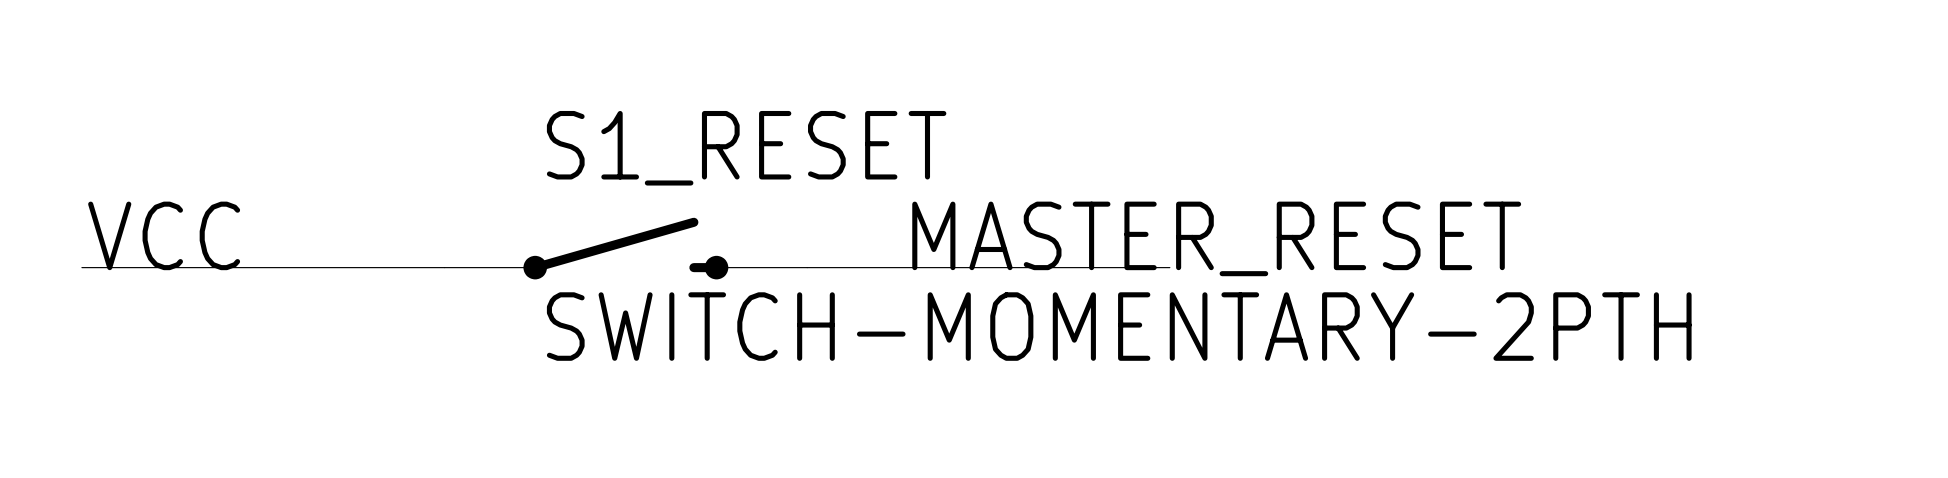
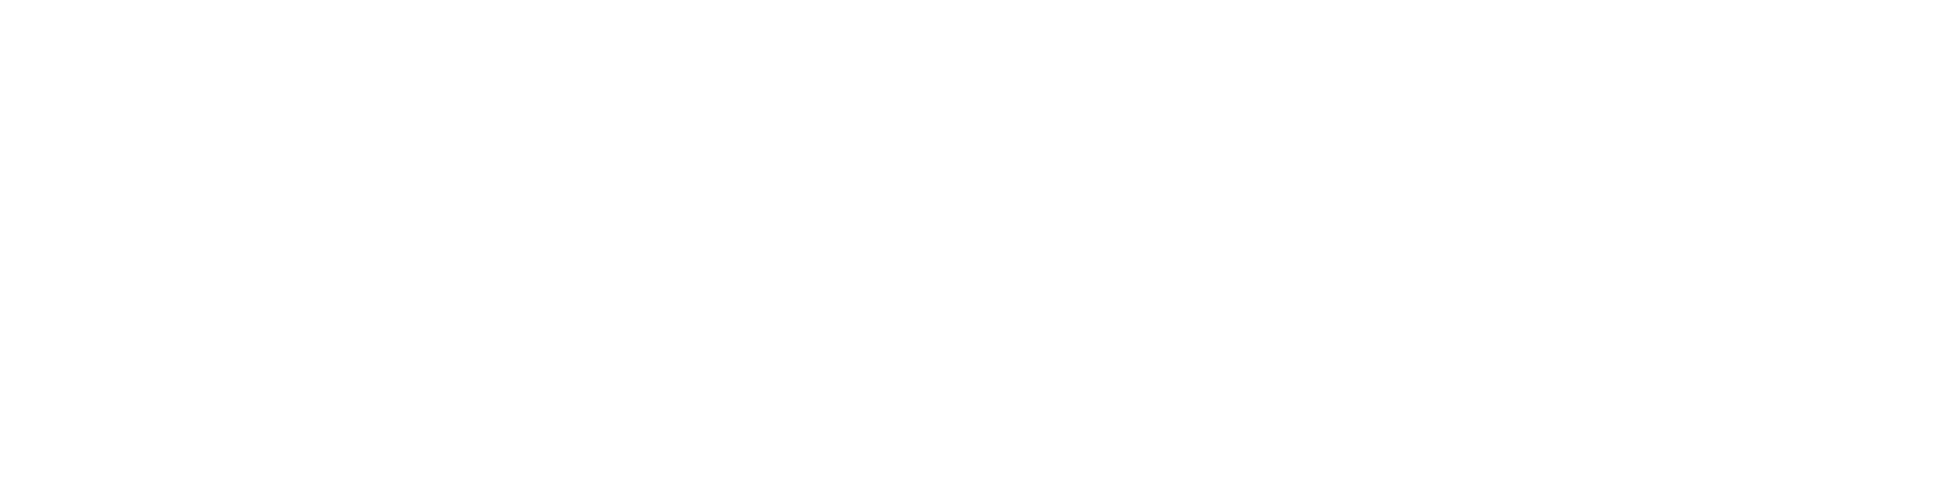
label: VCC (164, 235) -> none
label: MASTER_RESET (1216, 238) -> none
S1_RESET: SWITCH-MOMENTARY-2PTH (625, 248) -> none
wire: (81, 267) (444, 267) -> none
wire: (807, 267) (1169, 267) -> none

